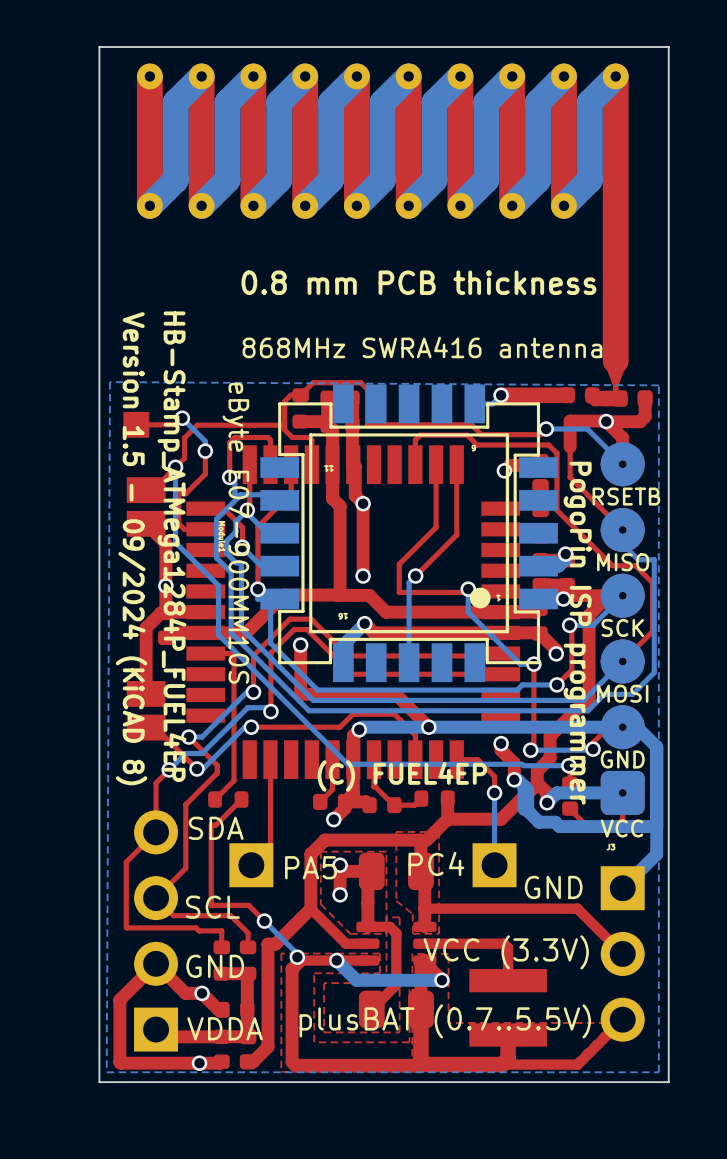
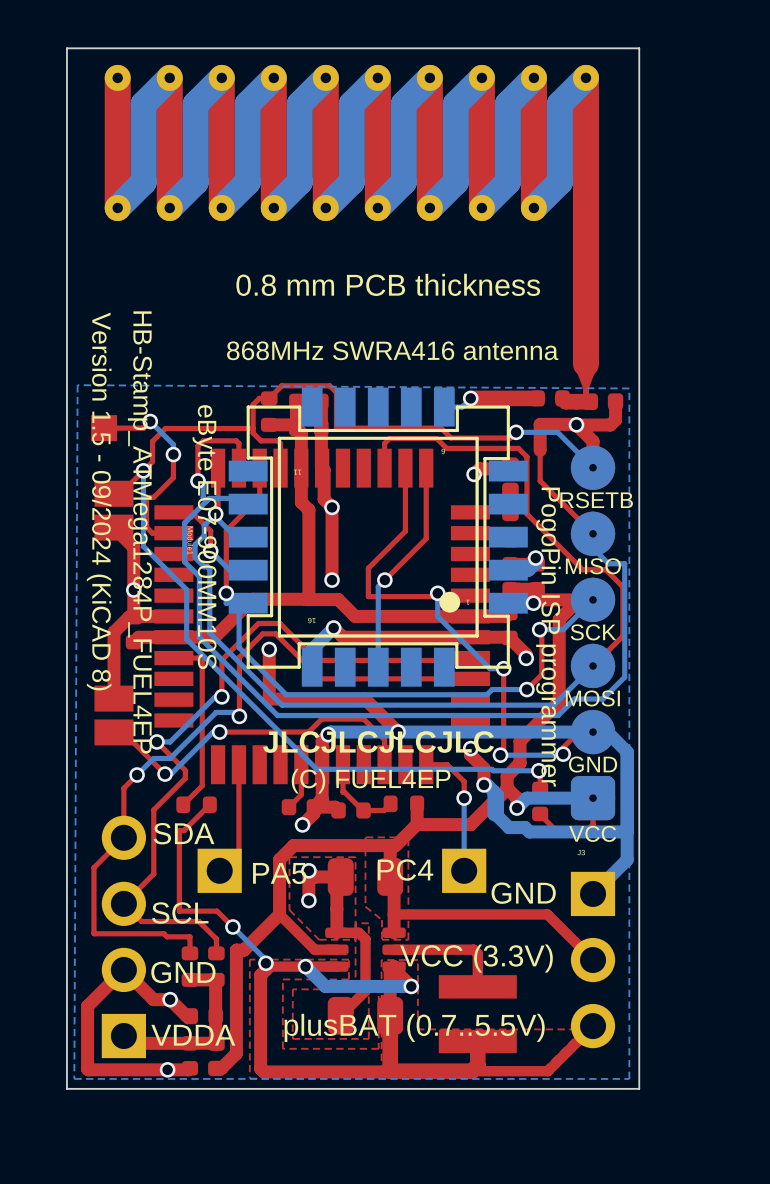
text: none -> JLCJLCJLCJLC (378, 742)

